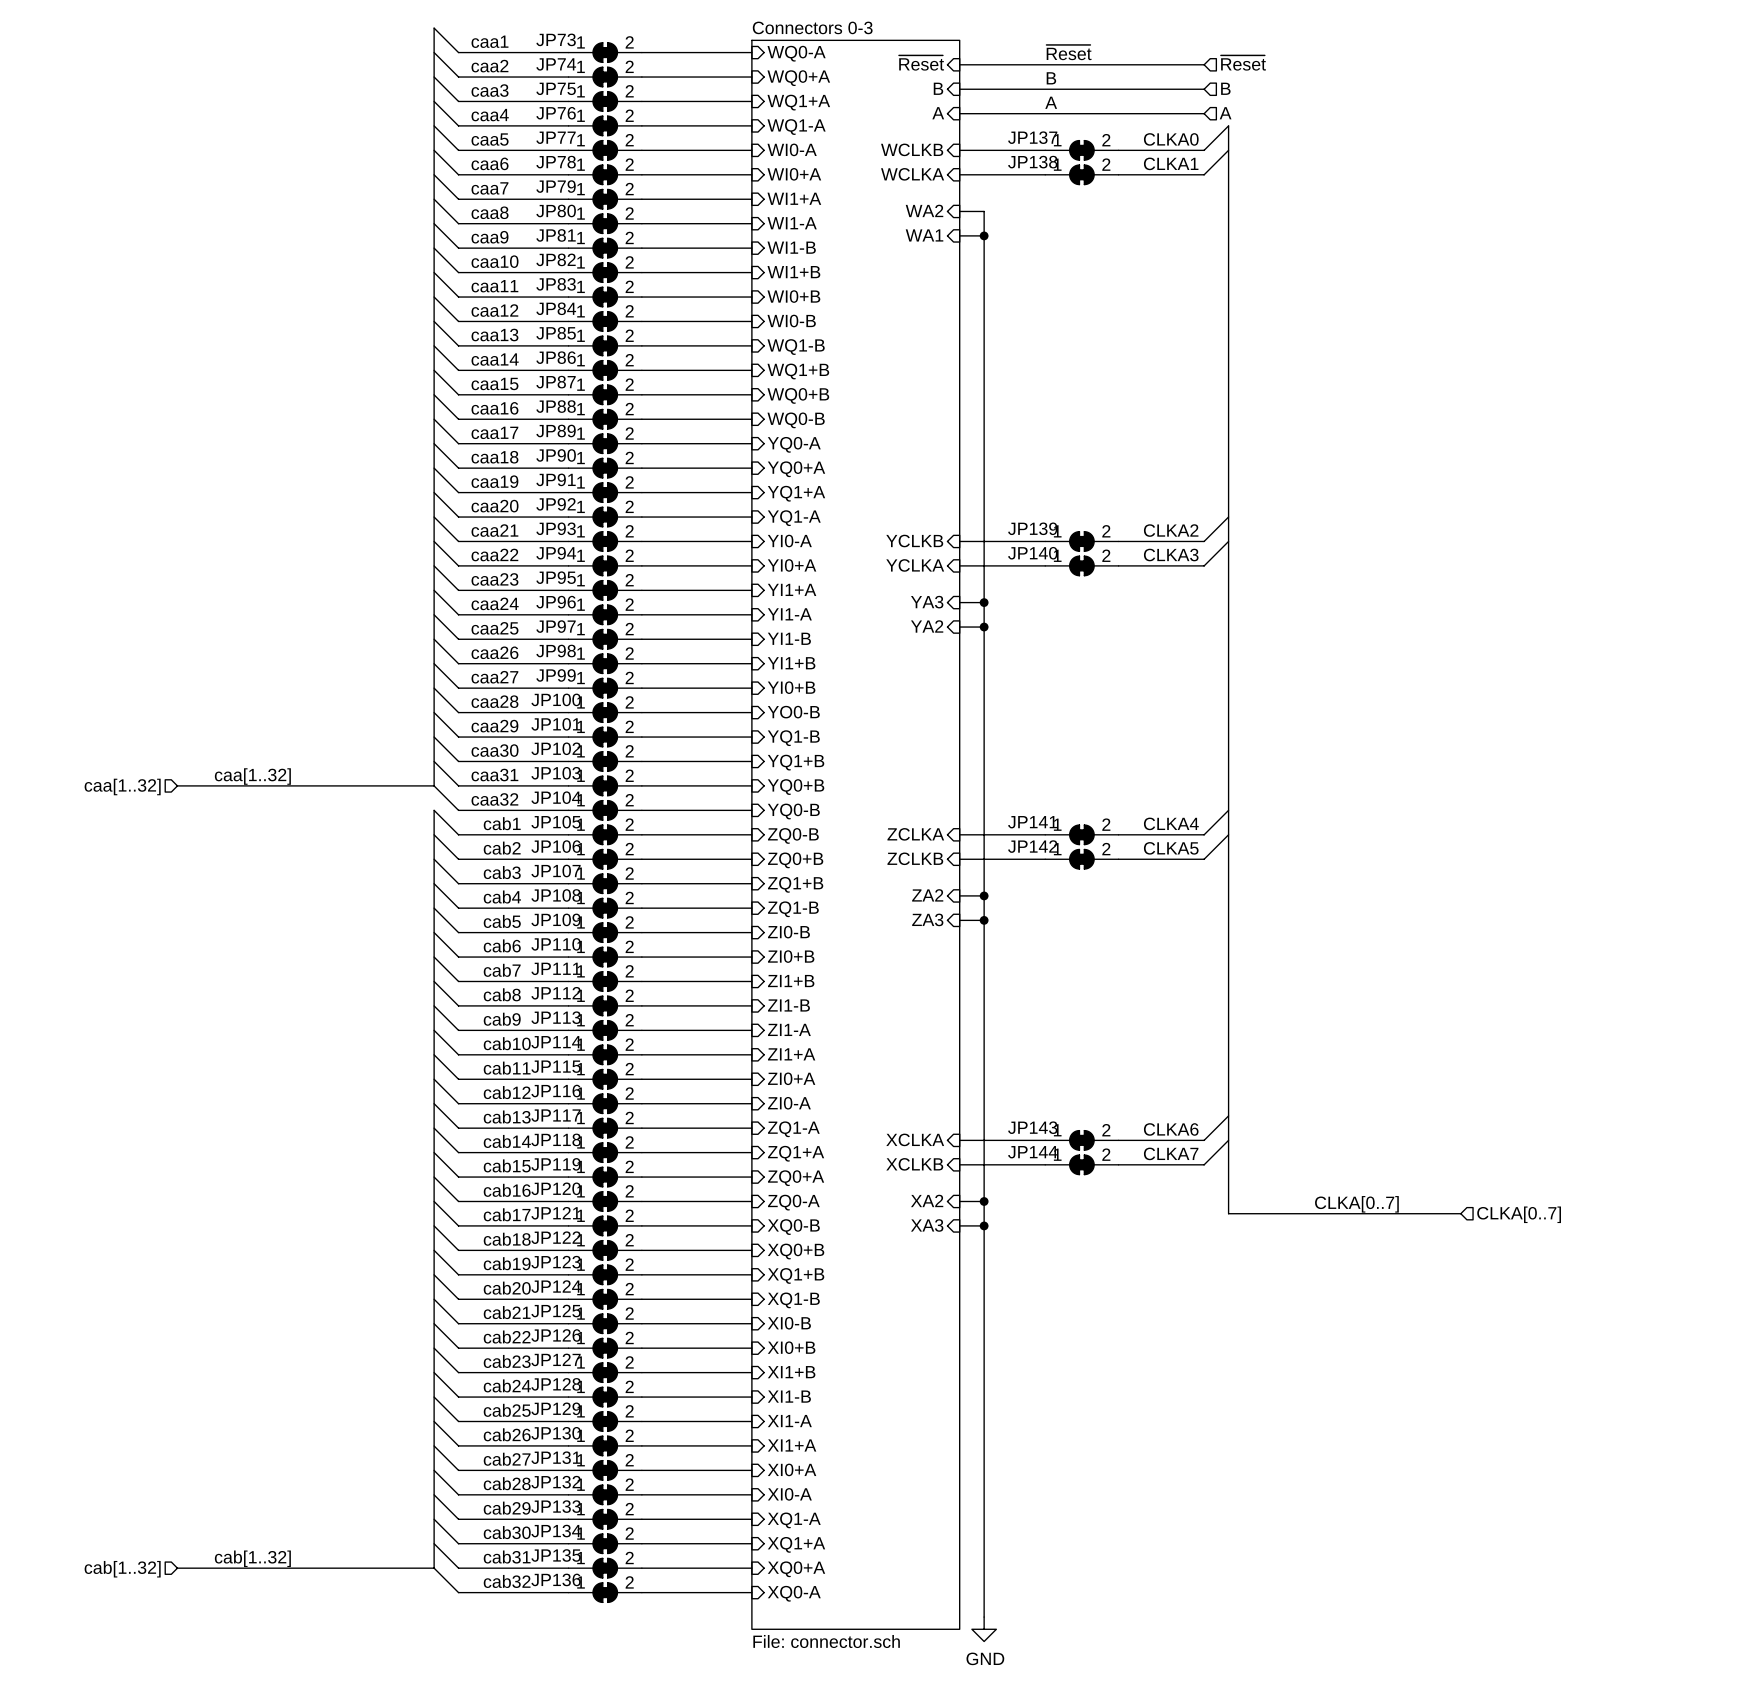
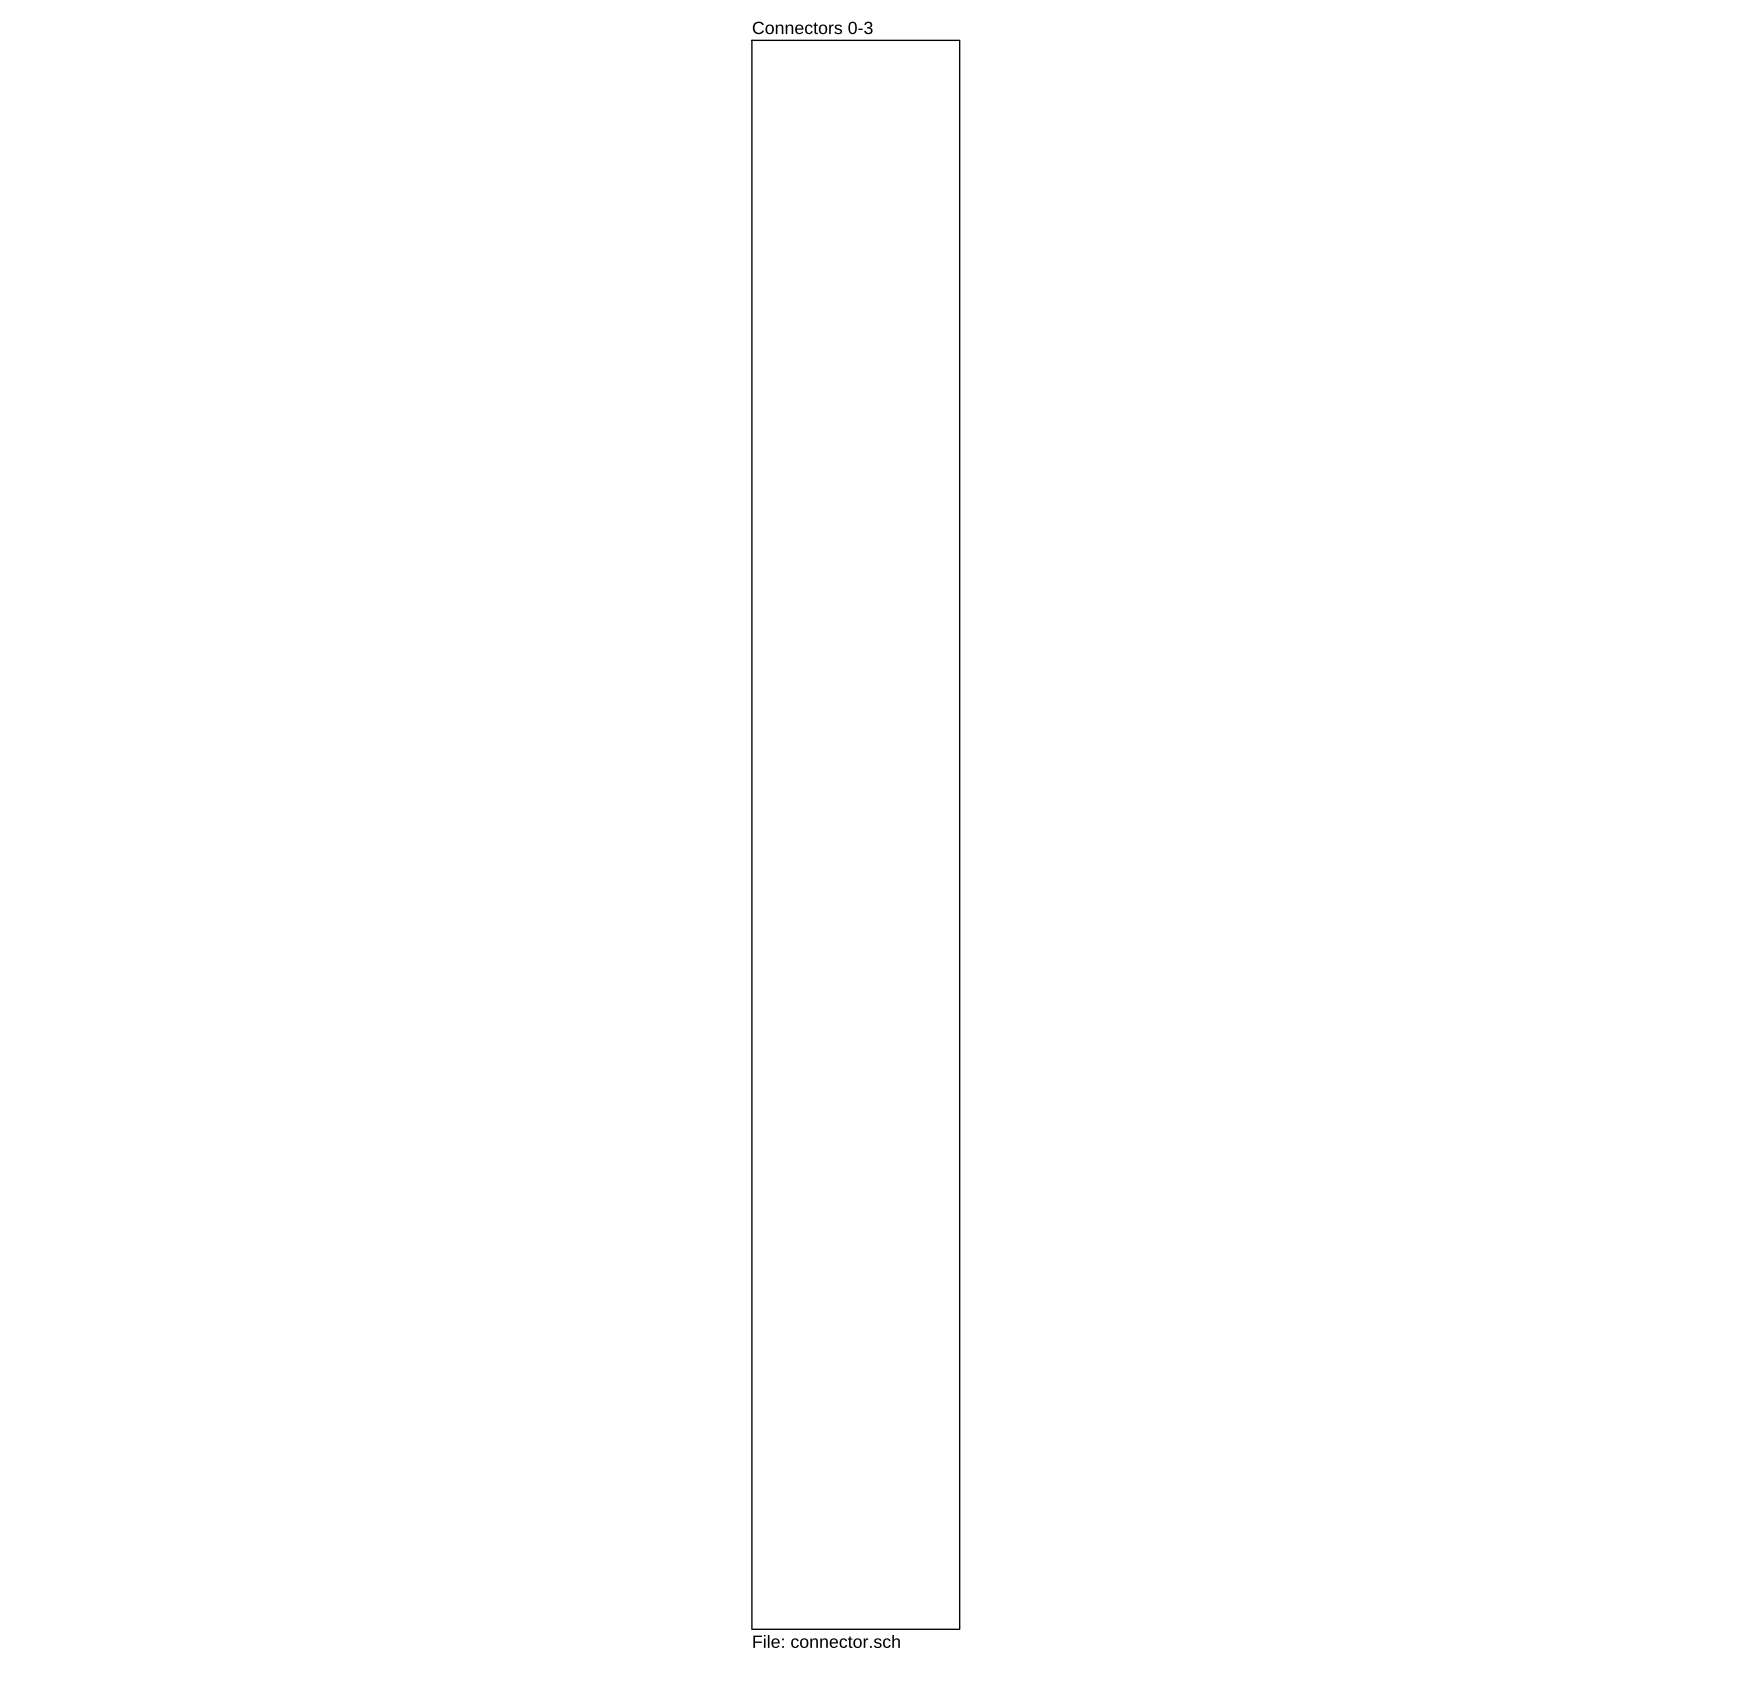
wire: (434, 28) (458, 52) (568, 52) -> none
bus: (434, 28) (434, 785) (177, 785) -> none
label: caa1 (489, 41) -> none
wire: (434, 52) (458, 77) (568, 77) -> none
JP73: (605, 52) -> none
wire: (641, 52) (751, 52) -> none
label: ~{Reset} (1068, 52) -> none
sheet pin: WQ0-A (796, 53) -> none
sheet pin: ~{Reset} (921, 63) -> none
hierarchical label: ~{Reset} (1243, 63) -> none
wire: (959, 64) (1204, 64) -> none
label: caa2 (489, 66) -> none
wire: (434, 77) (458, 101) (568, 101) -> none
JP74: (605, 77) -> none
wire: (641, 77) (751, 77) -> none
sheet pin: WQ0+A (798, 78) -> none
label: B (1051, 78) -> none
sheet pin: B (938, 88) -> none
hierarchical label: B (1225, 88) -> none
wire: (959, 89) (1204, 89) -> none
label: caa3 (490, 90) -> none
wire: (434, 101) (458, 125) (568, 125) -> none
JP75: (605, 101) -> none
wire: (641, 101) (751, 101) -> none
sheet pin: WQ1+A (798, 102) -> none
label: A (1051, 102) -> none
sheet pin: A (938, 113) -> none
wire: (959, 113) (1204, 113) -> none
hierarchical label: A (1225, 113) -> none
label: caa4 (490, 115) -> none
wire: (434, 125) (458, 150) (568, 150) -> none
JP76: (605, 125) -> none
wire: (641, 125) (751, 125) -> none
wire: (1228, 125) (1204, 150) (1118, 150) -> none
bus: (1228, 125) (1228, 1213) (1460, 1213) -> none
sheet pin: WQ1-A (796, 127) -> none
label: caa5 (490, 139) -> none
label: CLKA0 (1171, 139) -> none
sheet pin: WI0-A (792, 149) -> none
sheet pin: WCLKB (912, 149) -> none
wire: (434, 150) (458, 174) (568, 174) -> none
JP77: (605, 150) -> none
wire: (641, 150) (751, 150) -> none
wire: (959, 150) (1045, 150) -> none
JP137: (1081, 150) -> none
wire: (1228, 150) (1204, 174) (1118, 174) -> none
label: caa6 (490, 163) -> none
label: CLKA1 (1171, 163) -> none
wire: (434, 174) (458, 199) (568, 199) -> none
JP78: (605, 174) -> none
wire: (641, 174) (751, 174) -> none
sheet pin: WI0+A (794, 174) -> none
sheet pin: WCLKA (912, 174) -> none
wire: (959, 174) (1045, 174) -> none
JP138: (1081, 174) -> none
label: caa7 (489, 188) -> none
sheet pin: WI1+A (794, 198) -> none
wire: (434, 199) (458, 223) (568, 223) -> none
JP79: (605, 199) -> none
wire: (641, 199) (751, 199) -> none
sheet pin: WA2 (924, 210) -> none
wire: (959, 211) (984, 211) (984, 1617) -> none
label: caa8 (490, 212) -> none
wire: (434, 223) (458, 248) (568, 248) -> none
JP80: (605, 223) -> none
wire: (641, 223) (751, 223) -> none
sheet pin: WI1-A (792, 223) -> none
sheet pin: WA1 (924, 235) -> none
wire: (959, 235) (984, 235) -> none
junction: (984, 235) -> none
label: caa9 (490, 237) -> none
sheet pin: WI1-B (791, 247) -> none
wire: (434, 248) (458, 272) (568, 272) -> none
JP81: (605, 248) -> none
wire: (641, 248) (751, 248) -> none
label: caa10 (495, 261) -> none
wire: (434, 272) (458, 297) (568, 297) -> none
JP82: (605, 272) -> none
wire: (641, 272) (751, 272) -> none
sheet pin: WI1+B (793, 272) -> none
label: caa11 (494, 286) -> none
sheet pin: WI0+B (793, 296) -> none
wire: (434, 297) (458, 321) (568, 321) -> none
JP83: (605, 297) -> none
wire: (641, 297) (751, 297) -> none
label: caa12 (494, 310) -> none
wire: (434, 321) (458, 345) (568, 345) -> none
JP84: (605, 321) -> none
wire: (641, 321) (751, 321) -> none
sheet pin: WI0-B (791, 321) -> none
label: caa13 (494, 335) -> none
wire: (434, 345) (458, 370) (568, 370) -> none
JP85: (605, 345) -> none
wire: (641, 345) (751, 345) -> none
sheet pin: WQ1-B (796, 347) -> none
label: caa14 (495, 359) -> none
wire: (434, 370) (458, 394) (568, 394) -> none
JP86: (605, 370) -> none
wire: (641, 370) (751, 370) -> none
sheet pin: WQ1+B (798, 371) -> none
label: caa15 (494, 383) -> none
wire: (434, 394) (458, 419) (568, 419) -> none
JP87: (605, 394) -> none
wire: (641, 394) (751, 394) -> none
sheet pin: WQ0+B (798, 395) -> none
label: caa16 (494, 408) -> none
wire: (434, 419) (458, 443) (568, 443) -> none
JP88: (605, 419) -> none
wire: (641, 419) (751, 419) -> none
sheet pin: WQ0-B (796, 420) -> none
label: caa17 (494, 432) -> none
wire: (434, 443) (458, 468) (568, 468) -> none
JP89: (605, 443) -> none
wire: (641, 443) (751, 443) -> none
sheet pin: YQ0-A (794, 444) -> none
label: caa18 (494, 457) -> none
wire: (434, 468) (458, 492) (568, 492) -> none
JP90: (605, 468) -> none
wire: (641, 468) (751, 468) -> none
sheet pin: YQ0+A (796, 469) -> none
label: caa19 (494, 481) -> none
wire: (434, 492) (458, 517) (568, 517) -> none
JP91: (605, 492) -> none
wire: (641, 492) (751, 492) -> none
sheet pin: YQ1+A (796, 493) -> none
label: caa20 (495, 506) -> none
wire: (434, 517) (458, 541) (568, 541) -> none
JP92: (605, 517) -> none
wire: (641, 517) (751, 517) -> none
wire: (1228, 517) (1204, 541) (1118, 541) -> none
sheet pin: YQ1-A (794, 518) -> none
label: caa21 (494, 530) -> none
label: CLKA2 (1171, 530) -> none
wire: (434, 541) (458, 565) (568, 565) -> none
JP93: (605, 541) -> none
wire: (641, 541) (751, 541) -> none
sheet pin: YI0-A (789, 541) -> none
sheet pin: YCLKB (914, 541) -> none
wire: (959, 541) (1045, 541) -> none
JP139: (1081, 541) -> none
wire: (1228, 541) (1204, 565) (1118, 565) -> none
label: caa22 (494, 555) -> none
label: CLKA3 (1171, 555) -> none
wire: (434, 565) (458, 590) (568, 590) -> none
JP94: (605, 565) -> none
wire: (641, 565) (751, 565) -> none
sheet pin: YI0+A (792, 565) -> none
sheet pin: YCLKA (915, 565) -> none
wire: (959, 565) (1045, 565) -> none
JP140: (1081, 565) -> none
label: caa23 (494, 579) -> none
sheet pin: YI1+A (792, 589) -> none
wire: (434, 590) (458, 614) (568, 614) -> none
JP95: (605, 590) -> none
wire: (641, 590) (751, 590) -> none
sheet pin: YA3 (927, 602) -> none
wire: (959, 602) (984, 602) -> none
junction: (984, 602) -> none
label: caa24 (495, 603) -> none
wire: (434, 614) (458, 639) (568, 639) -> none
JP96: (605, 614) -> none
wire: (641, 614) (751, 614) -> none
sheet pin: YI1-A (789, 614) -> none
sheet pin: YA2 (927, 626) -> none
wire: (959, 627) (984, 627) -> none
junction: (984, 627) -> none
label: caa25 (494, 628) -> none
sheet pin: YI1-B (789, 638) -> none
wire: (434, 639) (458, 663) (568, 663) -> none
JP97: (605, 639) -> none
wire: (641, 639) (751, 639) -> none
label: caa26 (494, 652) -> none
wire: (434, 663) (458, 688) (568, 688) -> none
JP98: (605, 663) -> none
wire: (641, 663) (751, 663) -> none
sheet pin: YI1+B (791, 663) -> none
label: caa27 (494, 677) -> none
sheet pin: YI0+B (791, 687) -> none
wire: (434, 688) (458, 712) (568, 712) -> none
JP99: (605, 688) -> none
wire: (641, 688) (751, 688) -> none
label: caa28 (494, 701) -> none
wire: (434, 712) (458, 737) (568, 737) -> none
JP100: (605, 712) -> none
wire: (641, 712) (751, 712) -> none
sheet pin: YO0-B (793, 712) -> none
label: caa29 (494, 726) -> none
wire: (434, 737) (458, 761) (568, 761) -> none
JP101: (605, 737) -> none
wire: (641, 737) (751, 737) -> none
sheet pin: YQ1-B (793, 738) -> none
label: caa30 (495, 750) -> none
wire: (434, 761) (458, 785) (568, 785) -> none
JP102: (605, 761) -> none
wire: (641, 761) (751, 761) -> none
sheet pin: YQ1+B (796, 762) -> none
label: caa31 (494, 775) -> none
label: caa[1..32] (252, 776) -> none
wire: (434, 785) (458, 810) (568, 810) -> none
JP103: (605, 785) -> none
wire: (641, 785) (751, 785) -> none
hierarchical label: caa[1..32] (122, 786) -> none
sheet pin: YQ0+B (796, 787) -> none
label: caa32 (494, 799) -> none
wire: (434, 810) (458, 834) (568, 834) -> none
bus: (434, 810) (434, 1568) (177, 1568) -> none
JP104: (605, 810) -> none
wire: (641, 810) (751, 810) -> none
wire: (1228, 810) (1204, 834) (1118, 834) -> none
sheet pin: YQ0-B (793, 811) -> none
label: cab1 (502, 823) -> none
label: CLKA4 (1171, 823) -> none
wire: (434, 834) (458, 859) (568, 859) -> none
JP105: (605, 834) -> none
wire: (641, 834) (751, 834) -> none
sheet pin: ZCLKA (915, 834) -> none
wire: (959, 834) (1045, 834) -> none
JP141: (1081, 834) -> none
wire: (1228, 834) (1204, 859) (1118, 859) -> none
sheet pin: ZQ0-B (793, 835) -> none
label: cab2 (502, 848) -> none
label: CLKA5 (1171, 848) -> none
sheet pin: ZCLKB (915, 858) -> none
wire: (434, 859) (458, 883) (568, 883) -> none
JP106: (605, 859) -> none
wire: (641, 859) (751, 859) -> none
wire: (959, 859) (1045, 859) -> none
JP142: (1081, 859) -> none
sheet pin: ZQ0+B (795, 860) -> none
label: cab3 (502, 872) -> none
wire: (434, 883) (458, 908) (568, 908) -> none
JP107: (605, 883) -> none
wire: (641, 883) (751, 883) -> none
sheet pin: ZQ1+B (795, 884) -> none
sheet pin: ZA2 (927, 895) -> none
wire: (959, 895) (984, 895) -> none
junction: (984, 895) -> none
label: cab4 (502, 897) -> none
wire: (434, 908) (458, 932) (568, 932) -> none
JP108: (605, 908) -> none
wire: (641, 908) (751, 908) -> none
sheet pin: ZQ1-B (793, 909) -> none
sheet pin: ZA3 (927, 919) -> none
wire: (959, 920) (984, 920) -> none
junction: (984, 920) -> none
label: cab5 (502, 921) -> none
wire: (434, 932) (458, 957) (568, 957) -> none
JP109: (605, 932) -> none
wire: (641, 932) (751, 932) -> none
sheet pin: ZI0-B (788, 932) -> none
label: cab6 (502, 945) -> none
sheet pin: ZI0+B (791, 956) -> none
wire: (434, 957) (458, 981) (568, 981) -> none
JP110: (605, 957) -> none
wire: (641, 957) (751, 957) -> none
label: cab7 (502, 970) -> none
wire: (434, 981) (458, 1005) (568, 1005) -> none
JP111: (605, 981) -> none
wire: (641, 981) (751, 981) -> none
sheet pin: ZI1+B (791, 981) -> none
label: cab8 (502, 994) -> none
wire: (434, 1005) (458, 1030) (568, 1030) -> none
JP112: (605, 1005) -> none
wire: (641, 1005) (751, 1005) -> none
sheet pin: ZI1-B (788, 1005) -> none
label: cab9 (502, 1019) -> none
sheet pin: ZI1-A (789, 1029) -> none
wire: (434, 1030) (458, 1054) (568, 1054) -> none
JP113: (605, 1030) -> none
wire: (641, 1030) (751, 1030) -> none
label: cab10 (507, 1043) -> none
wire: (434, 1054) (458, 1079) (568, 1079) -> none
JP114: (605, 1054) -> none
wire: (641, 1054) (751, 1054) -> none
sheet pin: ZI1+A (791, 1054) -> none
label: cab11 (507, 1068) -> none
sheet pin: ZI0+A (791, 1078) -> none
wire: (434, 1079) (458, 1103) (568, 1103) -> none
JP115: (605, 1079) -> none
wire: (641, 1079) (751, 1079) -> none
label: cab12 (507, 1092) -> none
wire: (434, 1103) (458, 1128) (568, 1128) -> none
JP116: (605, 1103) -> none
wire: (641, 1103) (751, 1103) -> none
sheet pin: ZI0-A (789, 1103) -> none
wire: (1228, 1115) (1204, 1140) (1118, 1140) -> none
label: cab13 (507, 1117) -> none
wire: (434, 1128) (458, 1152) (568, 1152) -> none
JP117: (605, 1128) -> none
wire: (641, 1128) (751, 1128) -> none
sheet pin: ZQ1-A (793, 1129) -> none
label: CLKA6 (1171, 1129) -> none
sheet pin: XCLKA (915, 1139) -> none
wire: (959, 1140) (1045, 1140) -> none
JP143: (1081, 1140) -> none
wire: (1228, 1140) (1204, 1164) (1118, 1164) -> none
label: cab14 (507, 1141) -> none
wire: (434, 1152) (458, 1177) (568, 1177) -> none
JP118: (605, 1152) -> none
wire: (641, 1152) (751, 1152) -> none
sheet pin: ZQ1+A (796, 1153) -> none
label: CLKA7 (1171, 1153) -> none
sheet pin: XCLKB (914, 1164) -> none
wire: (959, 1164) (1045, 1164) -> none
JP144: (1081, 1164) -> none
label: cab15 (507, 1165) -> none
wire: (434, 1177) (458, 1201) (568, 1201) -> none
JP119: (605, 1177) -> none
wire: (641, 1177) (751, 1177) -> none
sheet pin: ZQ0+A (796, 1178) -> none
label: cab16 (507, 1190) -> none
sheet pin: XA2 (927, 1200) -> none
wire: (434, 1201) (458, 1225) (568, 1225) -> none
JP120: (605, 1201) -> none
wire: (641, 1201) (751, 1201) -> none
wire: (959, 1201) (984, 1201) -> none
junction: (984, 1201) -> none
sheet pin: ZQ0-A (793, 1202) -> none
label: CLKA[0..7] (1356, 1204) -> none
label: cab17 (507, 1214) -> none
hierarchical label: CLKA[0..7] (1519, 1214) -> none
wire: (434, 1225) (458, 1250) (568, 1250) -> none
JP121: (605, 1225) -> none
wire: (641, 1225) (751, 1225) -> none
sheet pin: XA3 (927, 1225) -> none
wire: (959, 1225) (984, 1225) -> none
junction: (984, 1225) -> none
sheet pin: XQ0-B (793, 1227) -> none
label: cab18 (507, 1239) -> none
wire: (434, 1250) (458, 1274) (568, 1274) -> none
JP122: (605, 1250) -> none
wire: (641, 1250) (751, 1250) -> none
sheet pin: XQ0+B (796, 1251) -> none
label: cab19 (507, 1263) -> none
wire: (434, 1274) (458, 1299) (568, 1299) -> none
JP123: (605, 1274) -> none
wire: (641, 1274) (751, 1274) -> none
sheet pin: XQ1+B (796, 1275) -> none
label: cab20 (507, 1288) -> none
wire: (434, 1299) (458, 1323) (568, 1323) -> none
JP124: (605, 1299) -> none
wire: (641, 1299) (751, 1299) -> none
sheet pin: XQ1-B (793, 1300) -> none
label: cab21 (507, 1312) -> none
wire: (434, 1323) (458, 1348) (568, 1348) -> none
JP125: (605, 1323) -> none
wire: (641, 1323) (751, 1323) -> none
sheet pin: XI0-B (789, 1323) -> none
label: cab22 (507, 1337) -> none
sheet pin: XI0+B (791, 1347) -> none
wire: (434, 1348) (458, 1372) (568, 1372) -> none
JP126: (605, 1348) -> none
wire: (641, 1348) (751, 1348) -> none
label: cab23 (507, 1361) -> none
wire: (434, 1372) (458, 1397) (568, 1397) -> none
JP127: (605, 1372) -> none
wire: (641, 1372) (751, 1372) -> none
sheet pin: XI1+B (791, 1372) -> none
label: cab24 (507, 1385) -> none
sheet pin: XI1-B (789, 1396) -> none
wire: (434, 1397) (458, 1421) (568, 1421) -> none
JP128: (605, 1397) -> none
wire: (641, 1397) (751, 1397) -> none
label: cab25 (507, 1410) -> none
wire: (434, 1421) (458, 1445) (568, 1445) -> none
JP129: (605, 1421) -> none
wire: (641, 1421) (751, 1421) -> none
sheet pin: XI1-A (789, 1421) -> none
label: cab26 (507, 1434) -> none
wire: (434, 1445) (458, 1470) (568, 1470) -> none
JP130: (605, 1445) -> none
wire: (641, 1445) (751, 1445) -> none
sheet pin: XI1+A (792, 1445) -> none
label: cab27 (507, 1459) -> none
sheet pin: XI0+A (792, 1469) -> none
wire: (434, 1470) (458, 1494) (568, 1494) -> none
JP131: (605, 1470) -> none
wire: (641, 1470) (751, 1470) -> none
label: cab28 (507, 1483) -> none
wire: (434, 1494) (458, 1519) (568, 1519) -> none
JP132: (605, 1494) -> none
wire: (641, 1494) (751, 1494) -> none
sheet pin: XI0-A (789, 1494) -> none
label: cab29 (507, 1508) -> none
wire: (434, 1519) (458, 1543) (568, 1543) -> none
JP133: (605, 1519) -> none
wire: (641, 1519) (751, 1519) -> none
sheet pin: XQ1-A (794, 1520) -> none
label: cab30 (507, 1532) -> none
wire: (434, 1543) (458, 1568) (568, 1568) -> none
JP134: (605, 1543) -> none
wire: (641, 1543) (751, 1543) -> none
sheet pin: XQ1+A (796, 1544) -> none
label: cab31 (507, 1557) -> none
label: cab[1..32] (252, 1558) -> none
wire: (434, 1568) (458, 1592) (568, 1592) -> none
JP135: (605, 1568) -> none
wire: (641, 1568) (751, 1568) -> none
hierarchical label: cab[1..32] (122, 1569) -> none
sheet pin: XQ0+A (796, 1569) -> none
label: cab32 (507, 1581) -> none
JP136: (605, 1592) -> none
wire: (641, 1592) (751, 1592) -> none
sheet pin: XQ0-A (794, 1593) -> none
power symbol: GND (984, 1629) -> none

